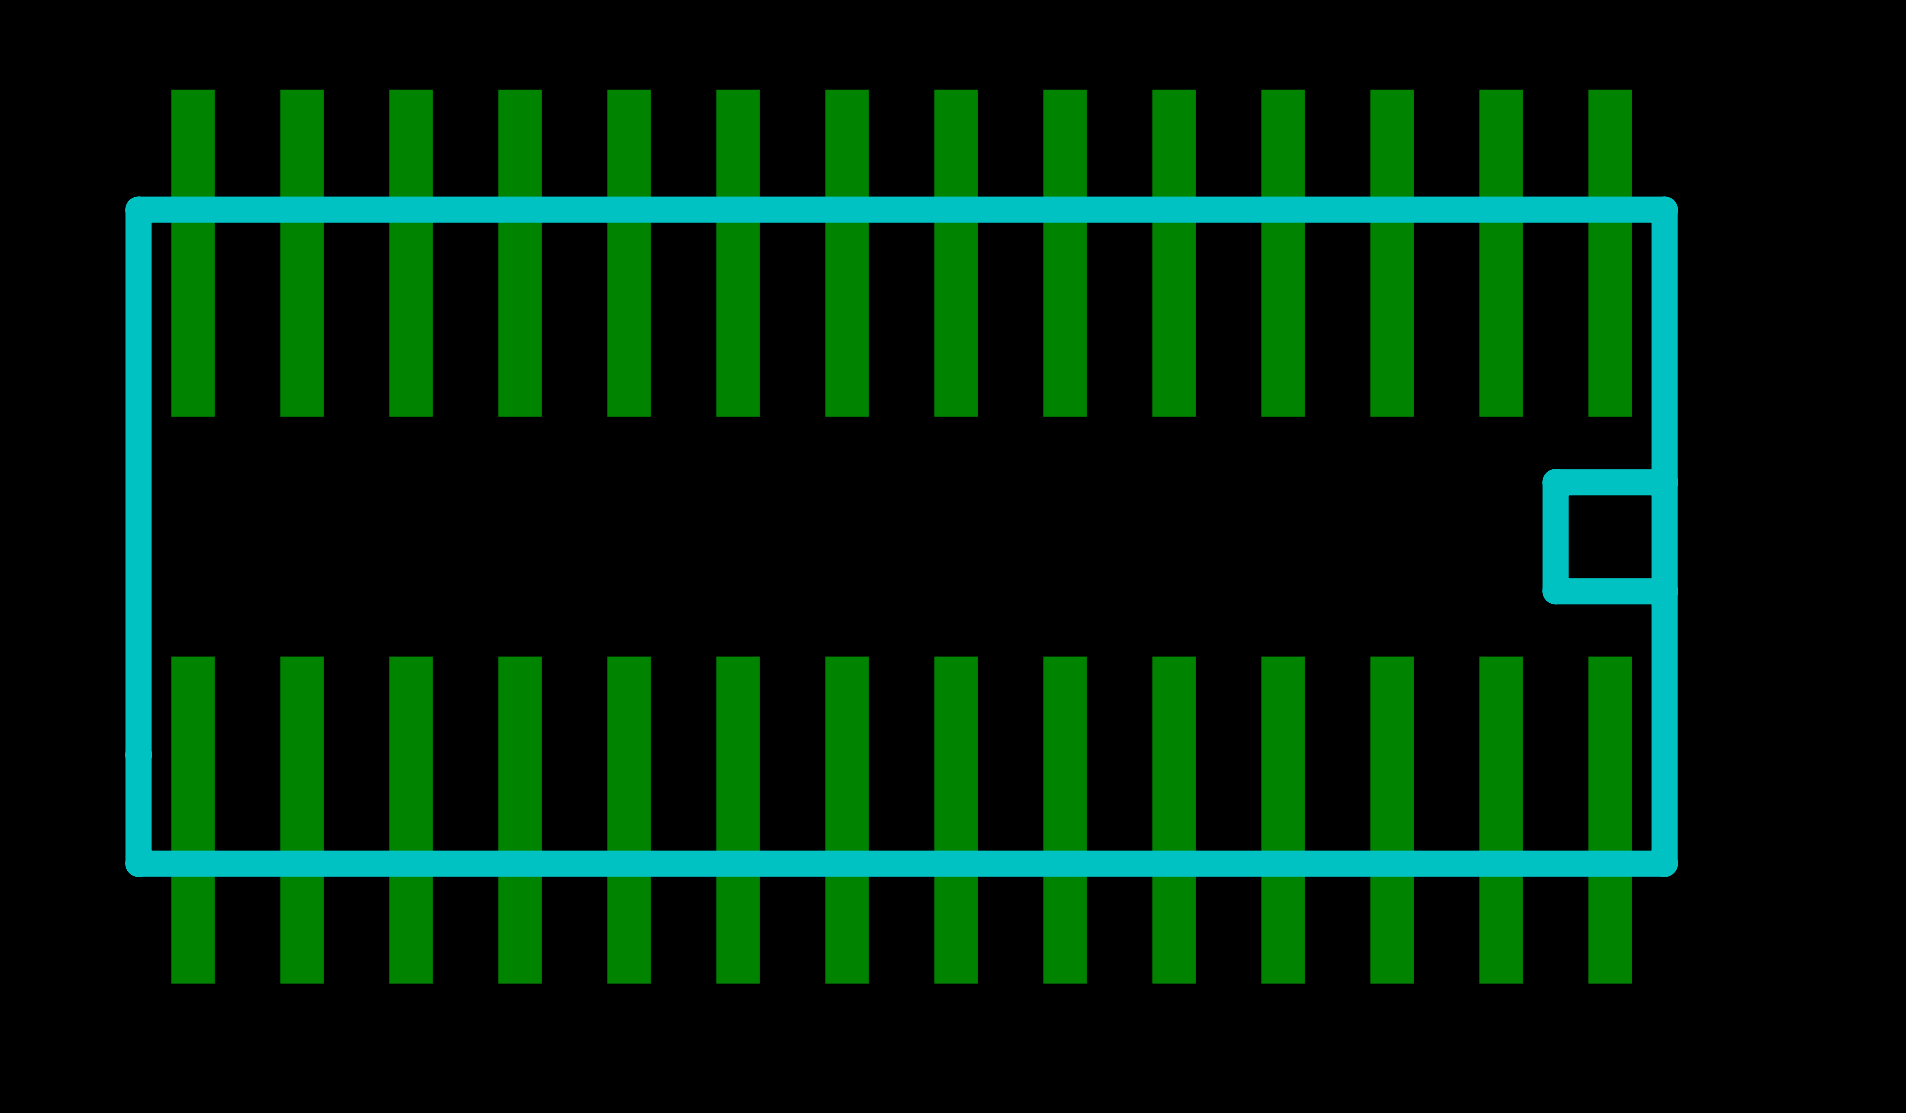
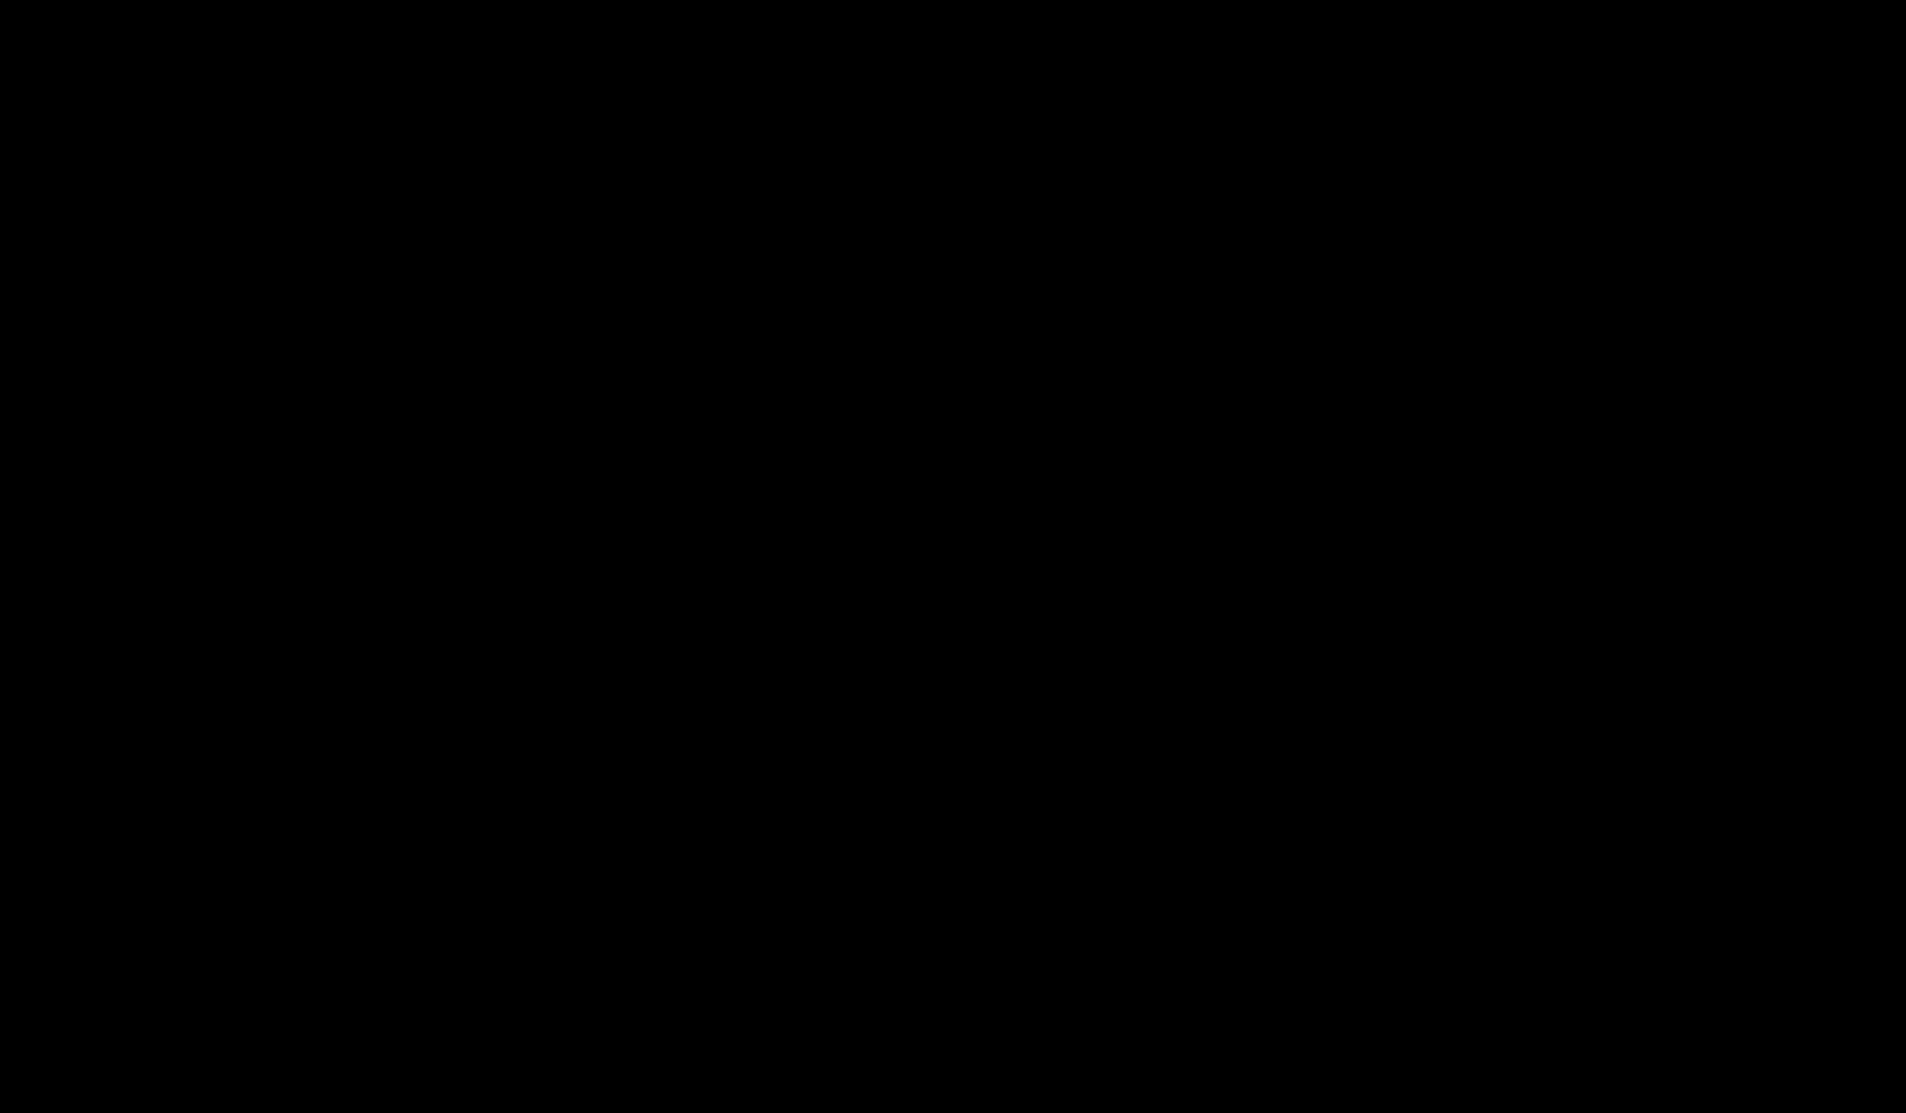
part: (901, 536) -> none

